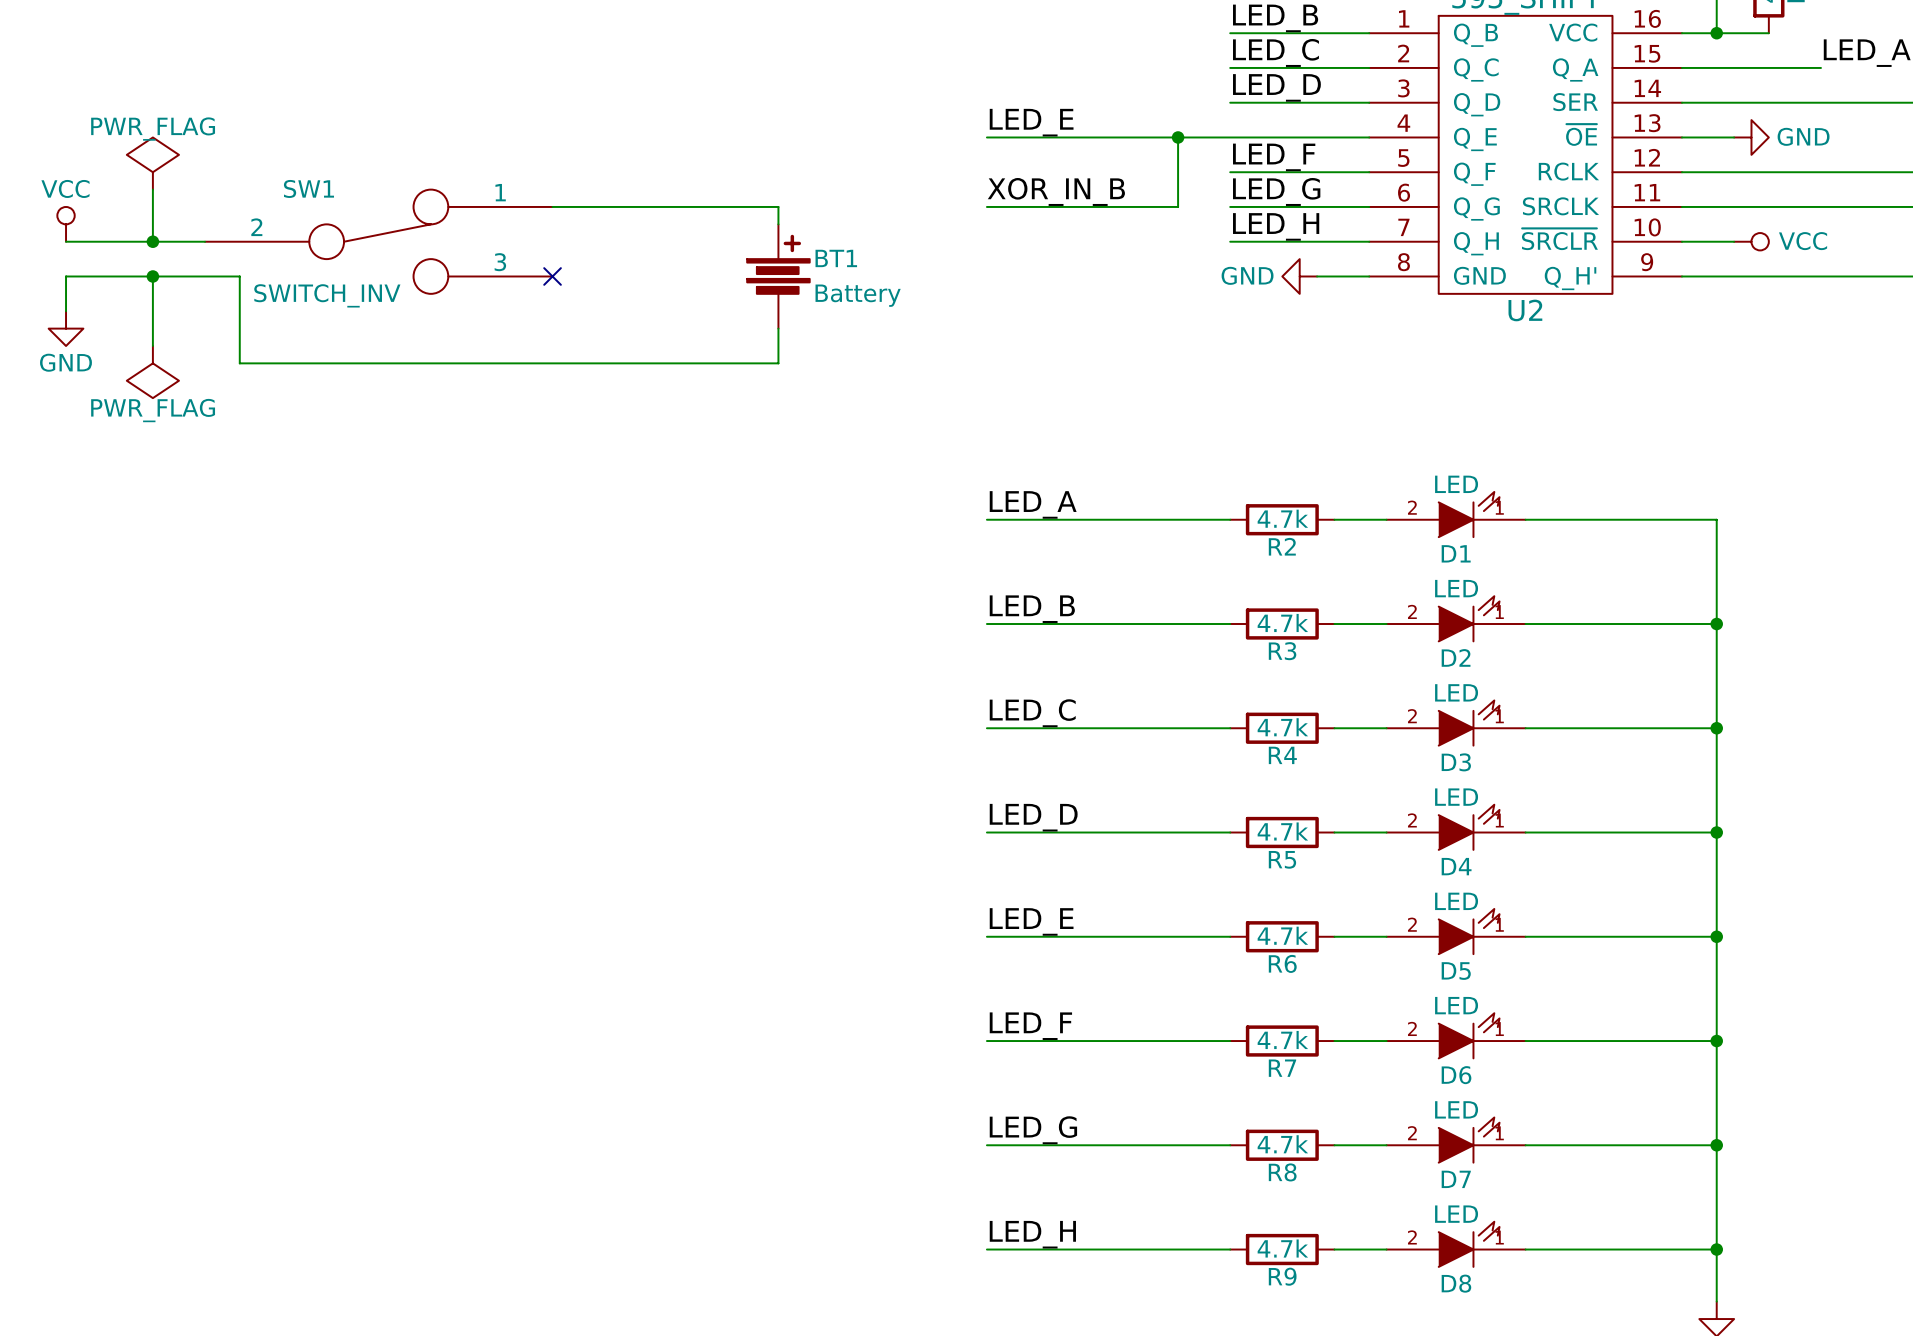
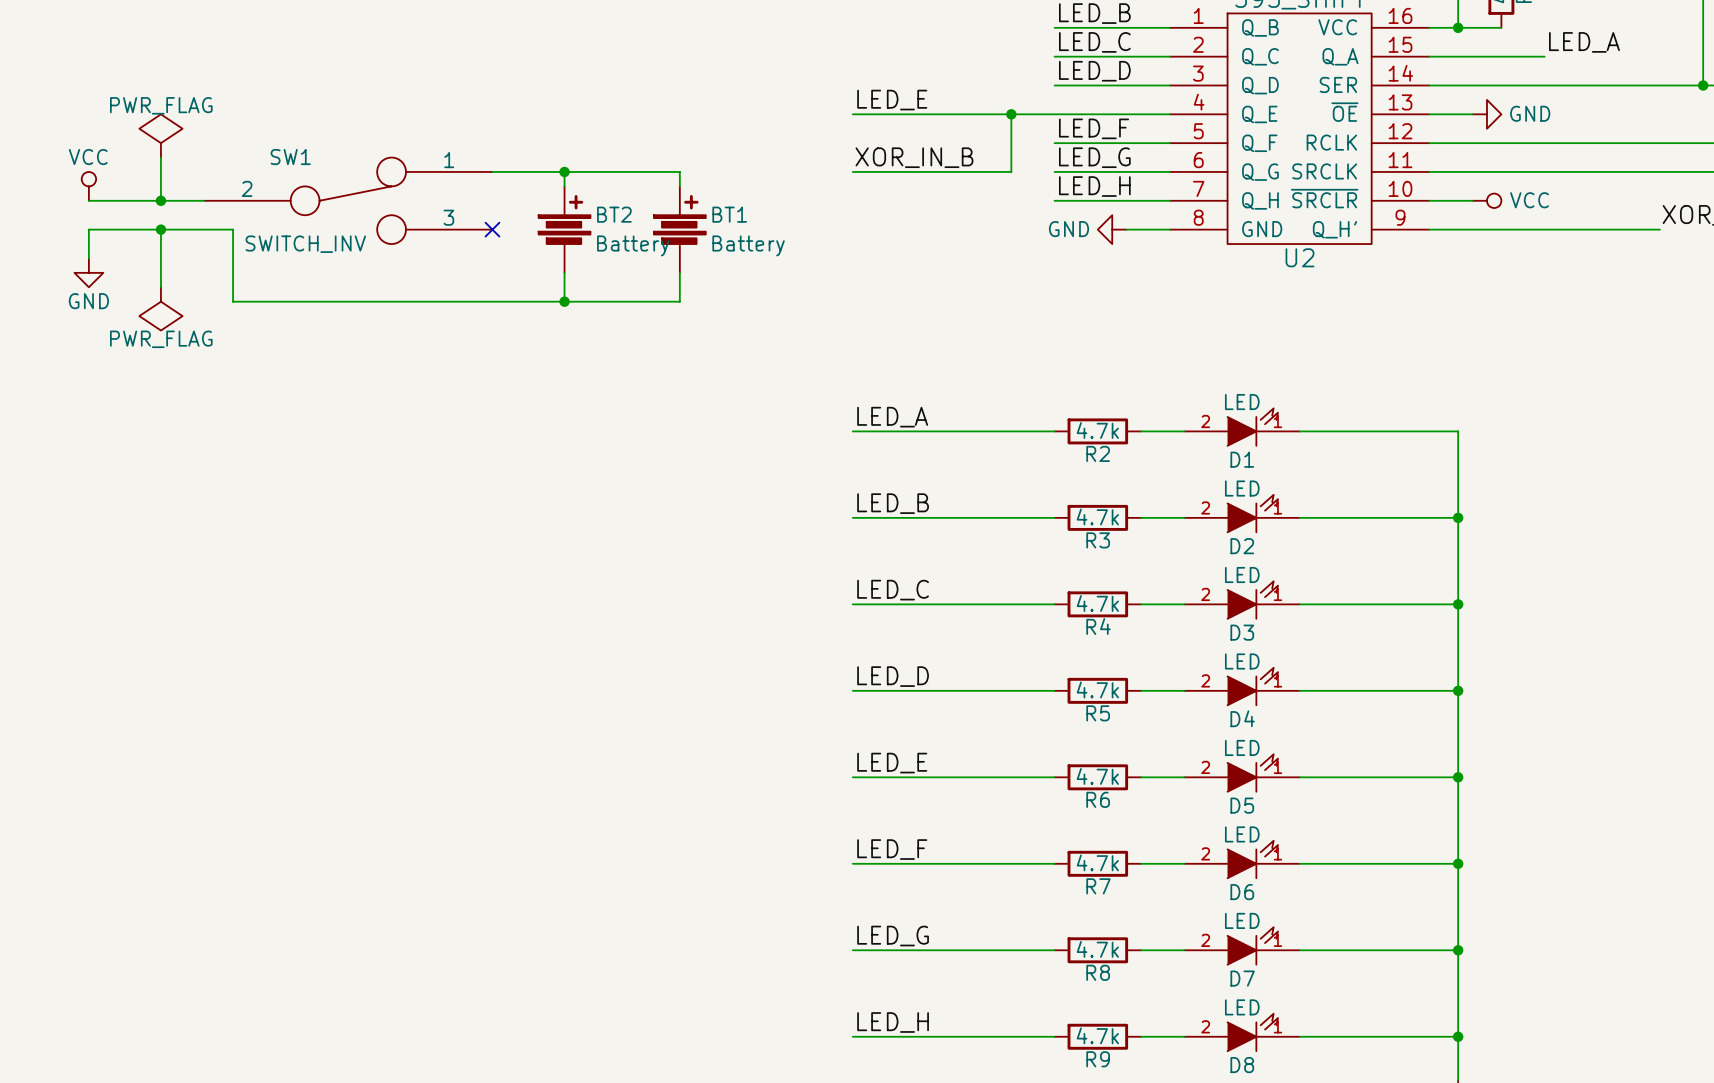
wire: none -> (564, 171) (564, 186)
junction: none -> (564, 171)
BT2: none -> Battery (564, 229)
wire: none -> (564, 272) (564, 301)
junction: none -> (564, 301)

